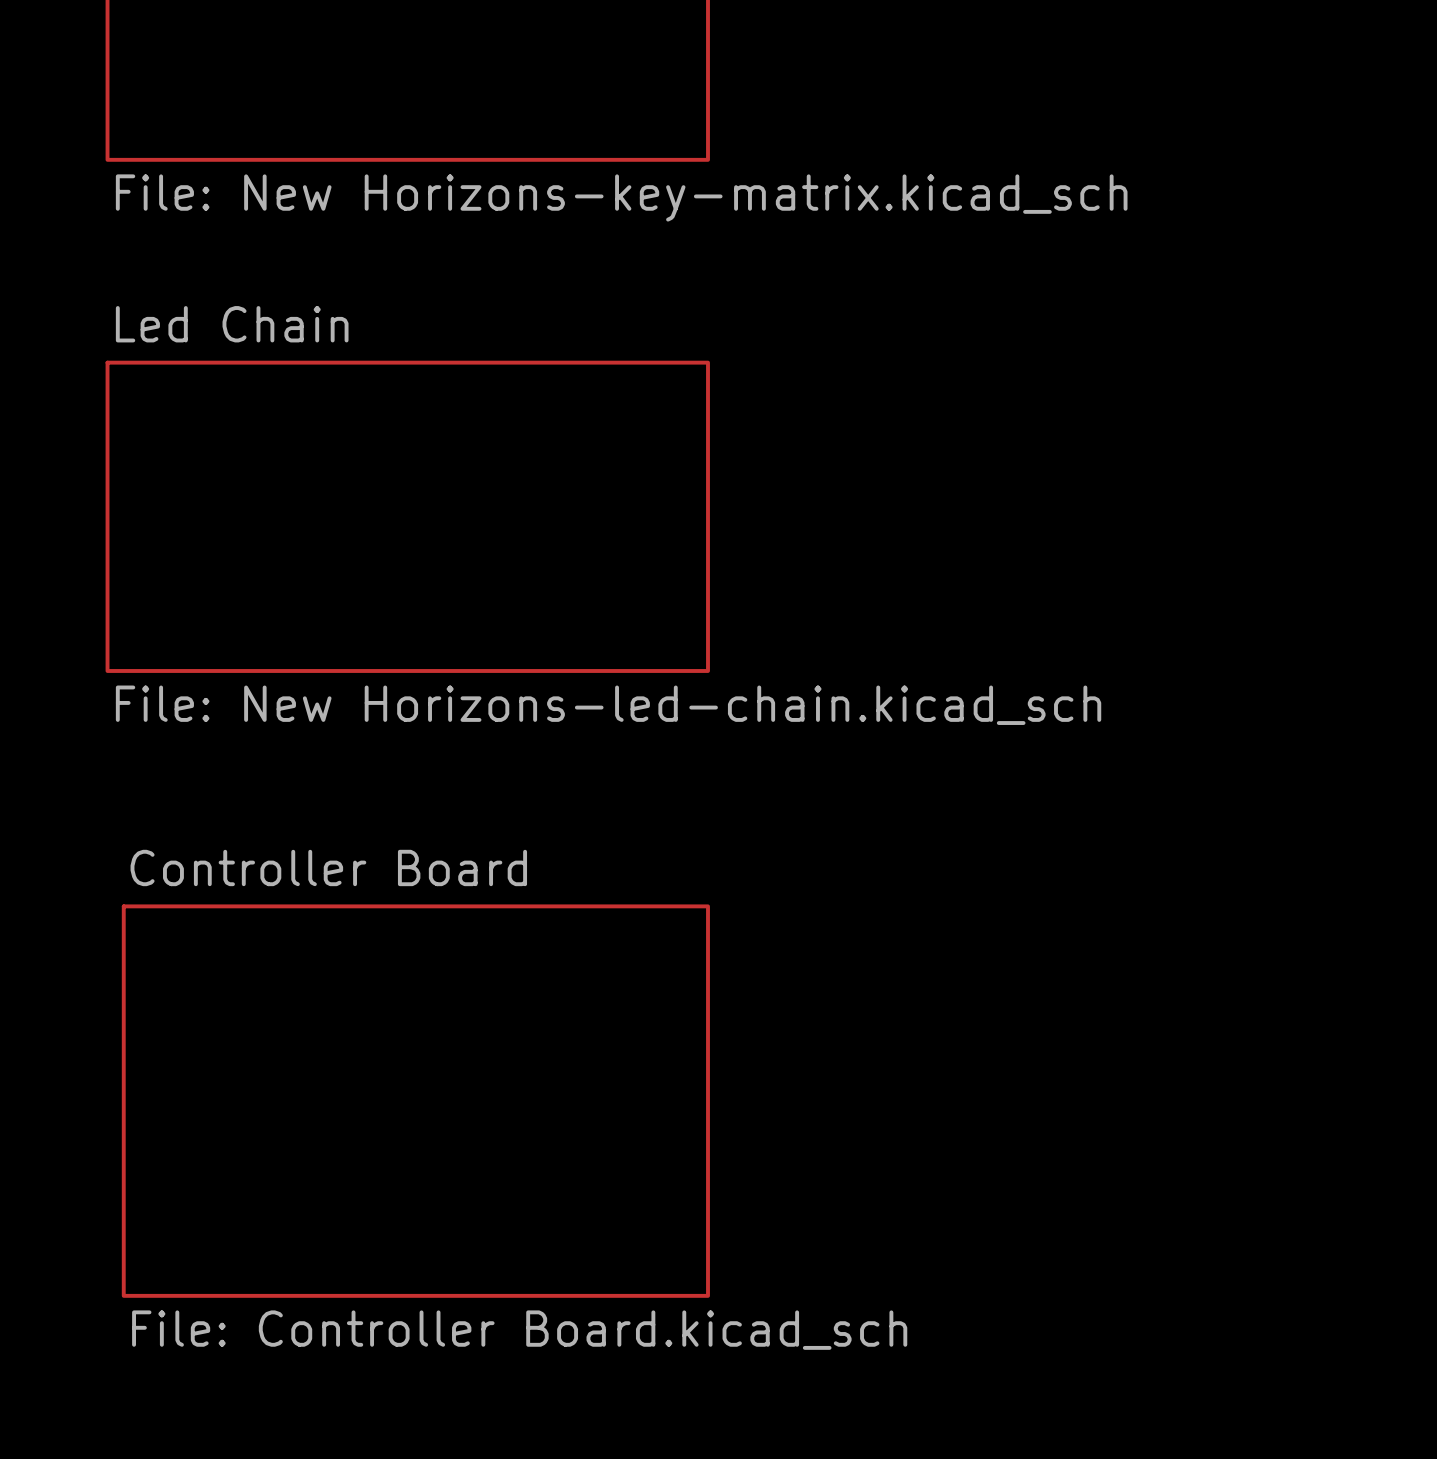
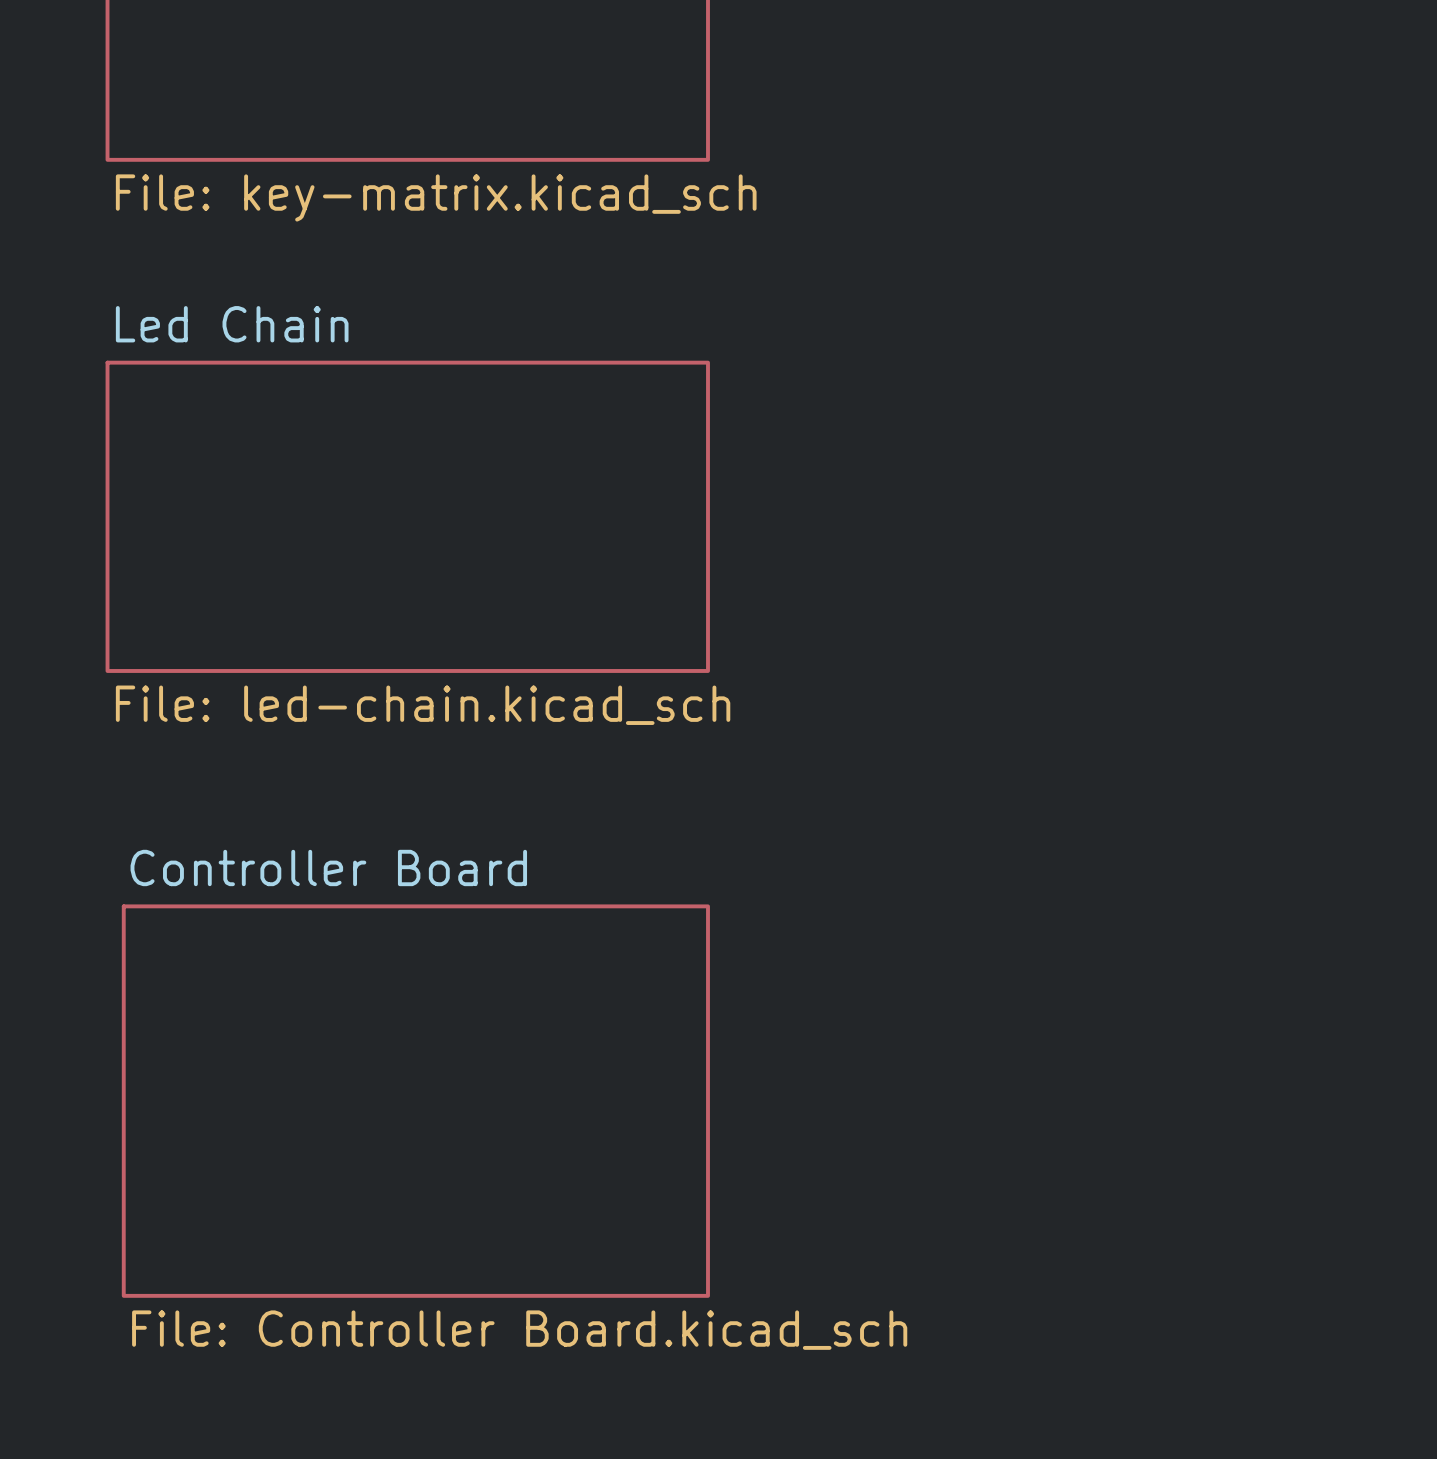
sheet value: File: New Horizons-key-matrix.kicad_sch (621, 197) -> File: key-matrix.kicad_sch (436, 197)
sheet Led Chain value: File: New Horizons-led-chain.kicad_sch (608, 705) -> File: led-chain.kicad_sch (423, 705)

